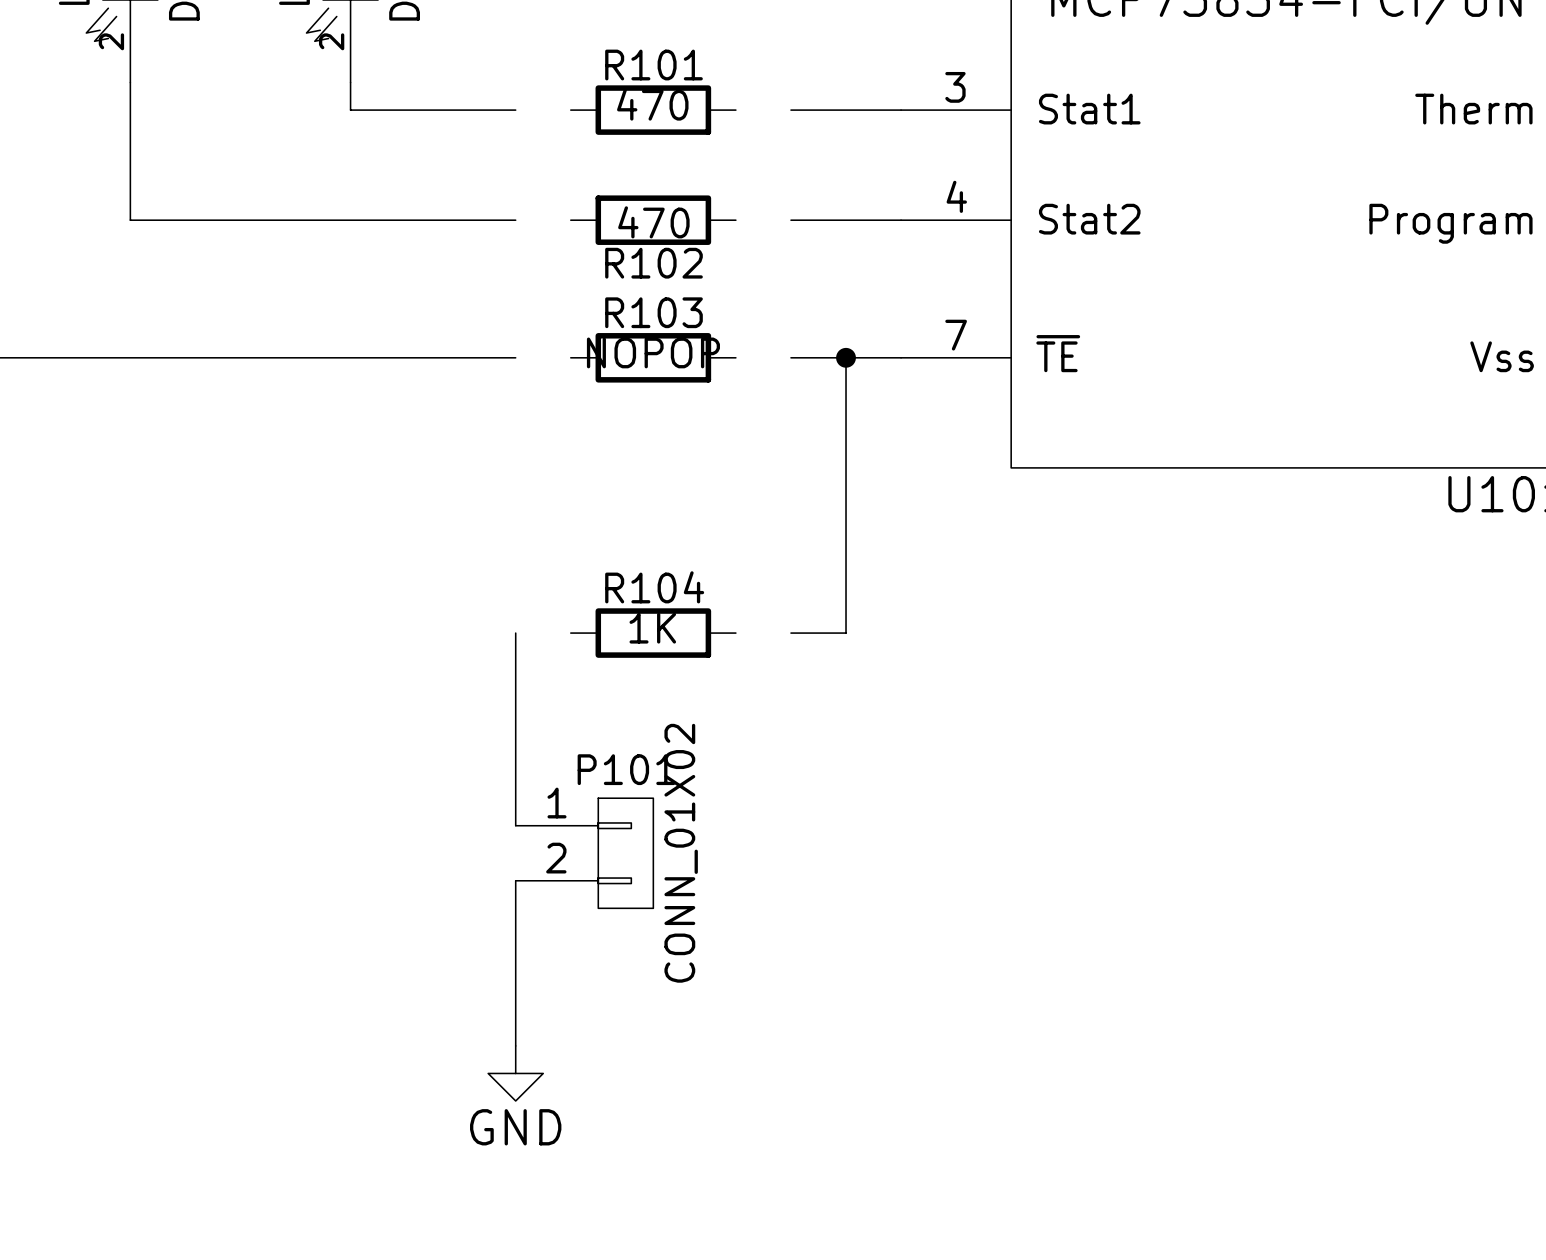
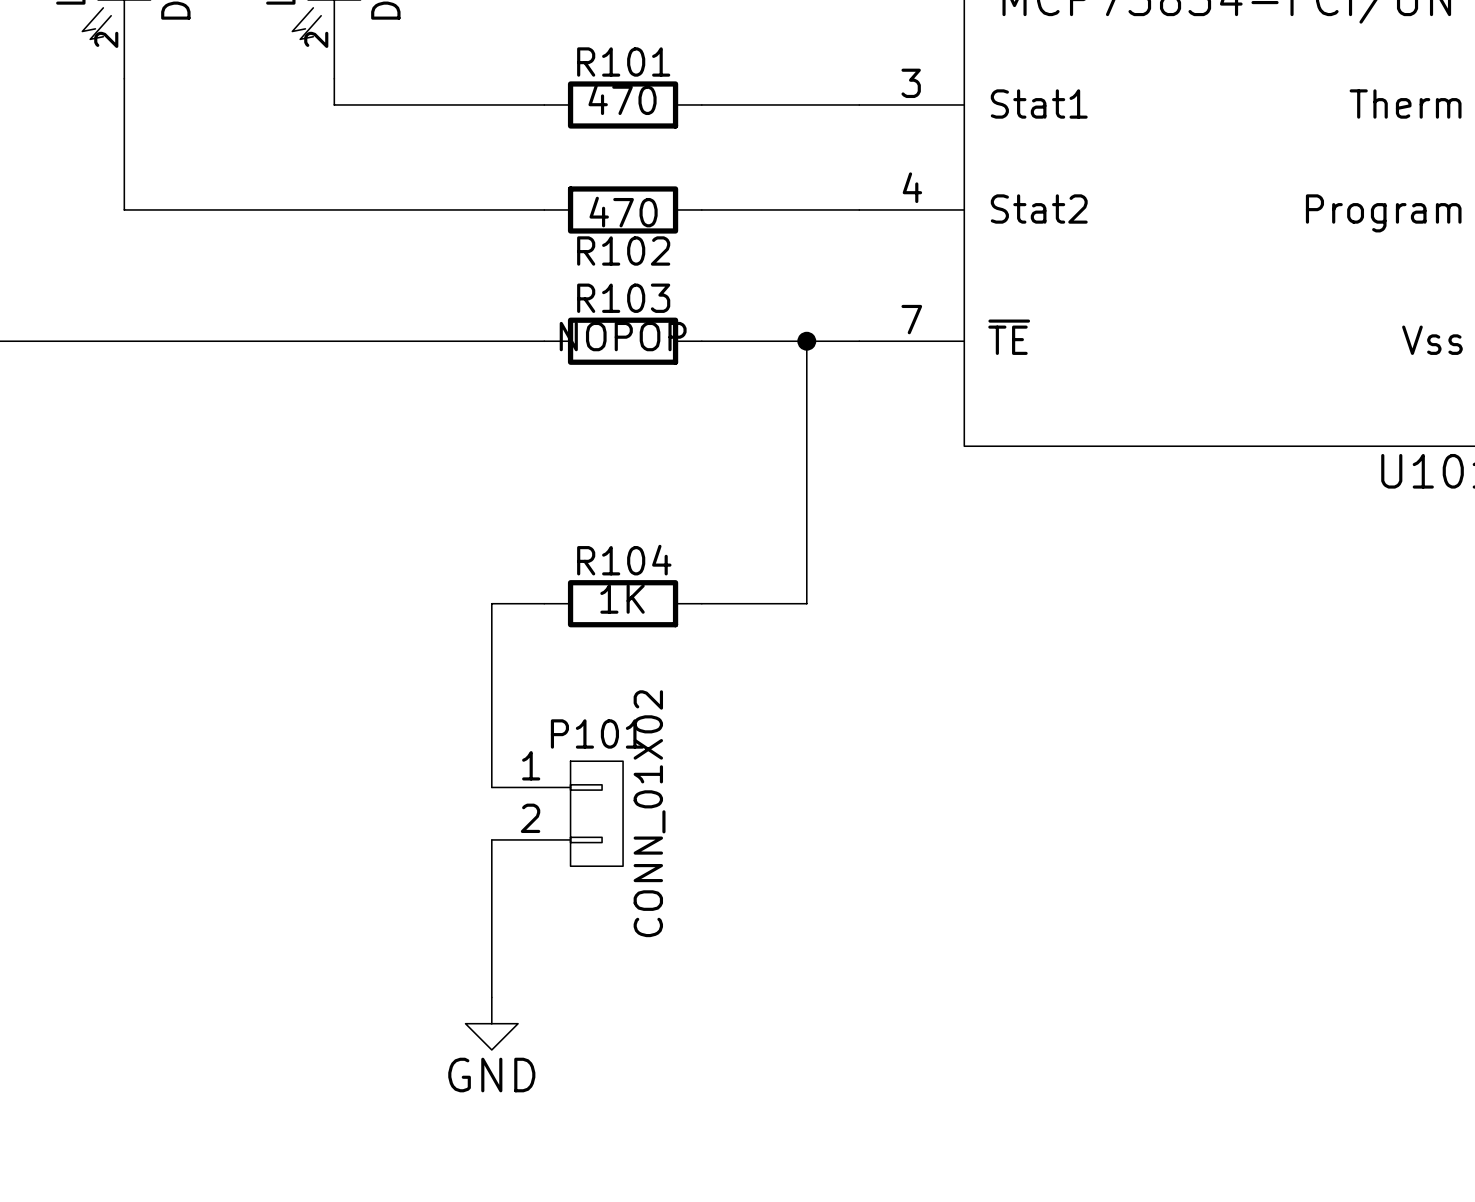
wire: none -> (491, 104) (544, 104)
wire: none -> (701, 104) (754, 104)
wire: none -> (491, 209) (544, 209)
wire: none -> (701, 209) (754, 209)
wire: none -> (491, 341) (544, 341)
wire: none -> (701, 341) (754, 341)
wire: none -> (491, 603) (544, 603)
wire: none -> (701, 603) (754, 603)

